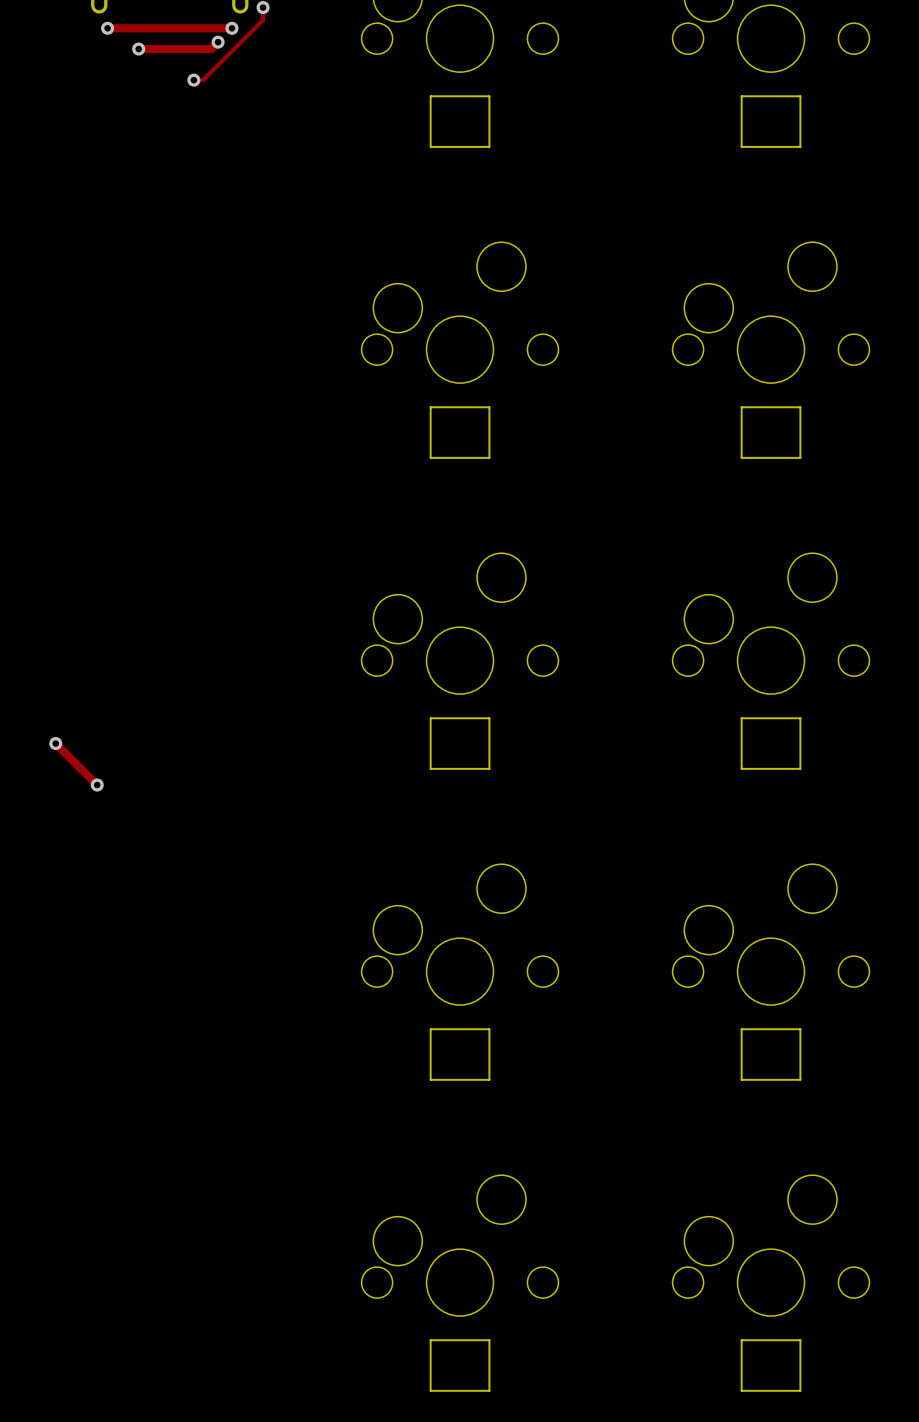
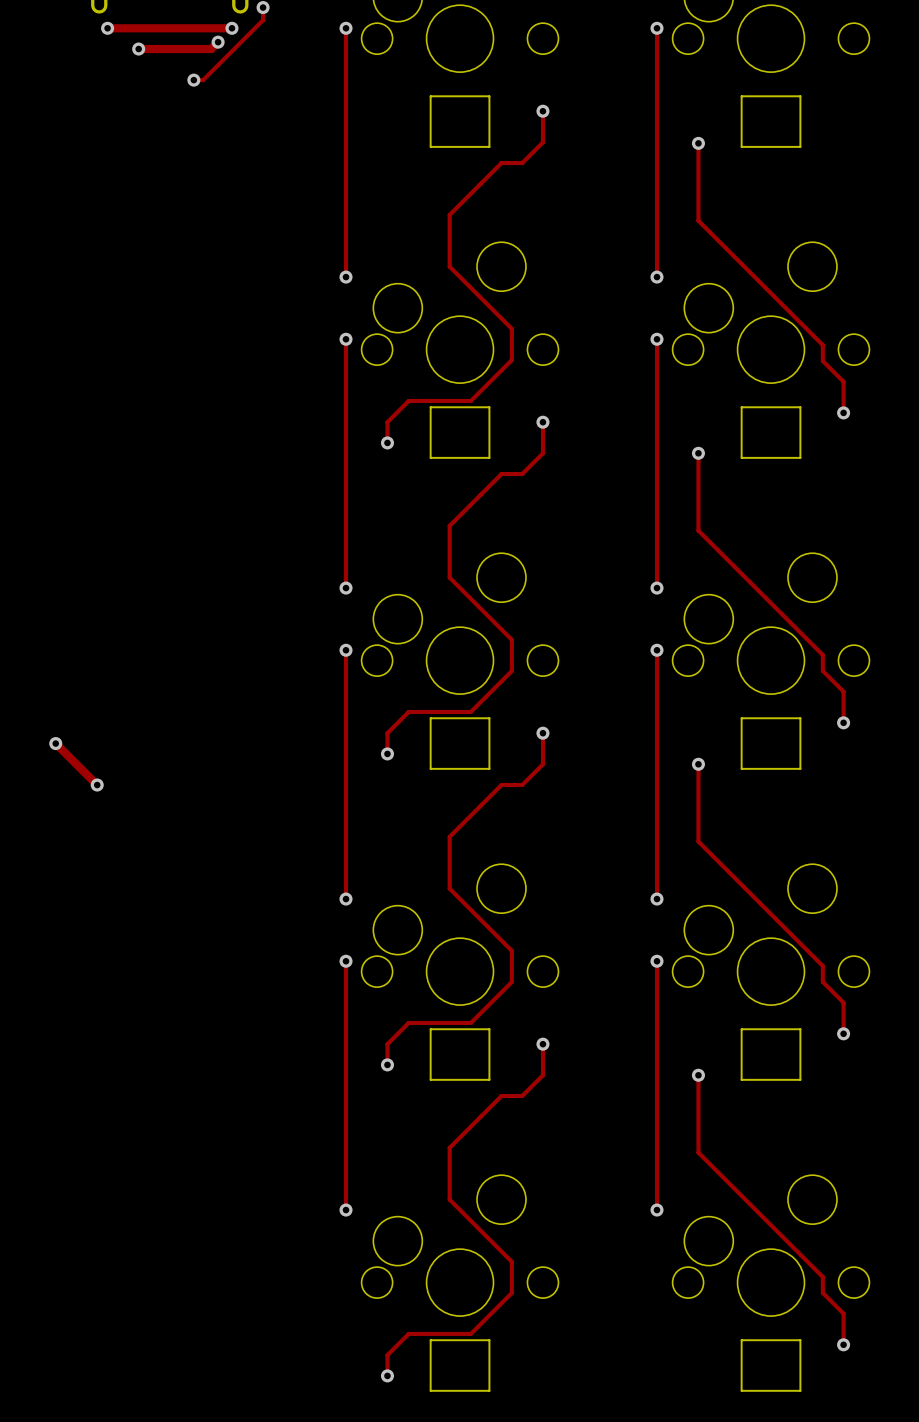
track: none -> (346, 28) (346, 277)
via: none -> (346, 28)
track: none -> (656, 28) (656, 277)
via: none -> (656, 28)
track: none -> (542, 111) (542, 142) (522, 163) (501, 163) (449, 214) (449, 266) (511, 328) (511, 360) (470, 400) (408, 400) (387, 422) (387, 442)
via: none -> (542, 111)
track: none -> (698, 143) (698, 220) (822, 345) (822, 361) (843, 381) (843, 412)
via: none -> (698, 143)
via: none -> (346, 277)
via: none -> (656, 277)
track: none -> (346, 339) (346, 588)
via: none -> (346, 339)
track: none -> (656, 339) (656, 588)
via: none -> (656, 339)
via: none -> (843, 412)
track: none -> (542, 422) (542, 453) (522, 474) (501, 474) (449, 525) (449, 577) (511, 639) (511, 670) (470, 711) (408, 711) (387, 733) (387, 753)
via: none -> (542, 422)
via: none -> (387, 442)
track: none -> (698, 453) (698, 530) (822, 655) (822, 670) (843, 691) (843, 722)
via: none -> (698, 453)
via: none -> (346, 588)
via: none -> (656, 588)
track: none -> (346, 650) (346, 899)
via: none -> (346, 650)
track: none -> (656, 650) (656, 899)
via: none -> (656, 650)
via: none -> (843, 722)
track: none -> (542, 733) (542, 764) (522, 785) (501, 785) (449, 836) (449, 888) (511, 950) (511, 981) (470, 1022) (408, 1022) (387, 1044) (387, 1064)
via: none -> (542, 733)
via: none -> (387, 753)
track: none -> (698, 764) (698, 841) (822, 966) (822, 981) (843, 1002) (843, 1033)
via: none -> (698, 764)
via: none -> (346, 899)
via: none -> (656, 899)
track: none -> (346, 961) (346, 1210)
via: none -> (346, 961)
track: none -> (656, 961) (656, 1210)
via: none -> (656, 961)
via: none -> (843, 1033)
track: none -> (542, 1044) (542, 1075) (522, 1096) (501, 1096) (449, 1147) (449, 1199) (511, 1261) (511, 1292) (470, 1333) (408, 1333) (387, 1355) (387, 1375)
via: none -> (542, 1044)
via: none -> (387, 1064)
track: none -> (698, 1075) (698, 1152) (822, 1277) (822, 1292) (843, 1313) (843, 1344)
via: none -> (698, 1075)
via: none -> (346, 1210)
via: none -> (656, 1210)
via: none -> (843, 1344)
via: none -> (387, 1375)

